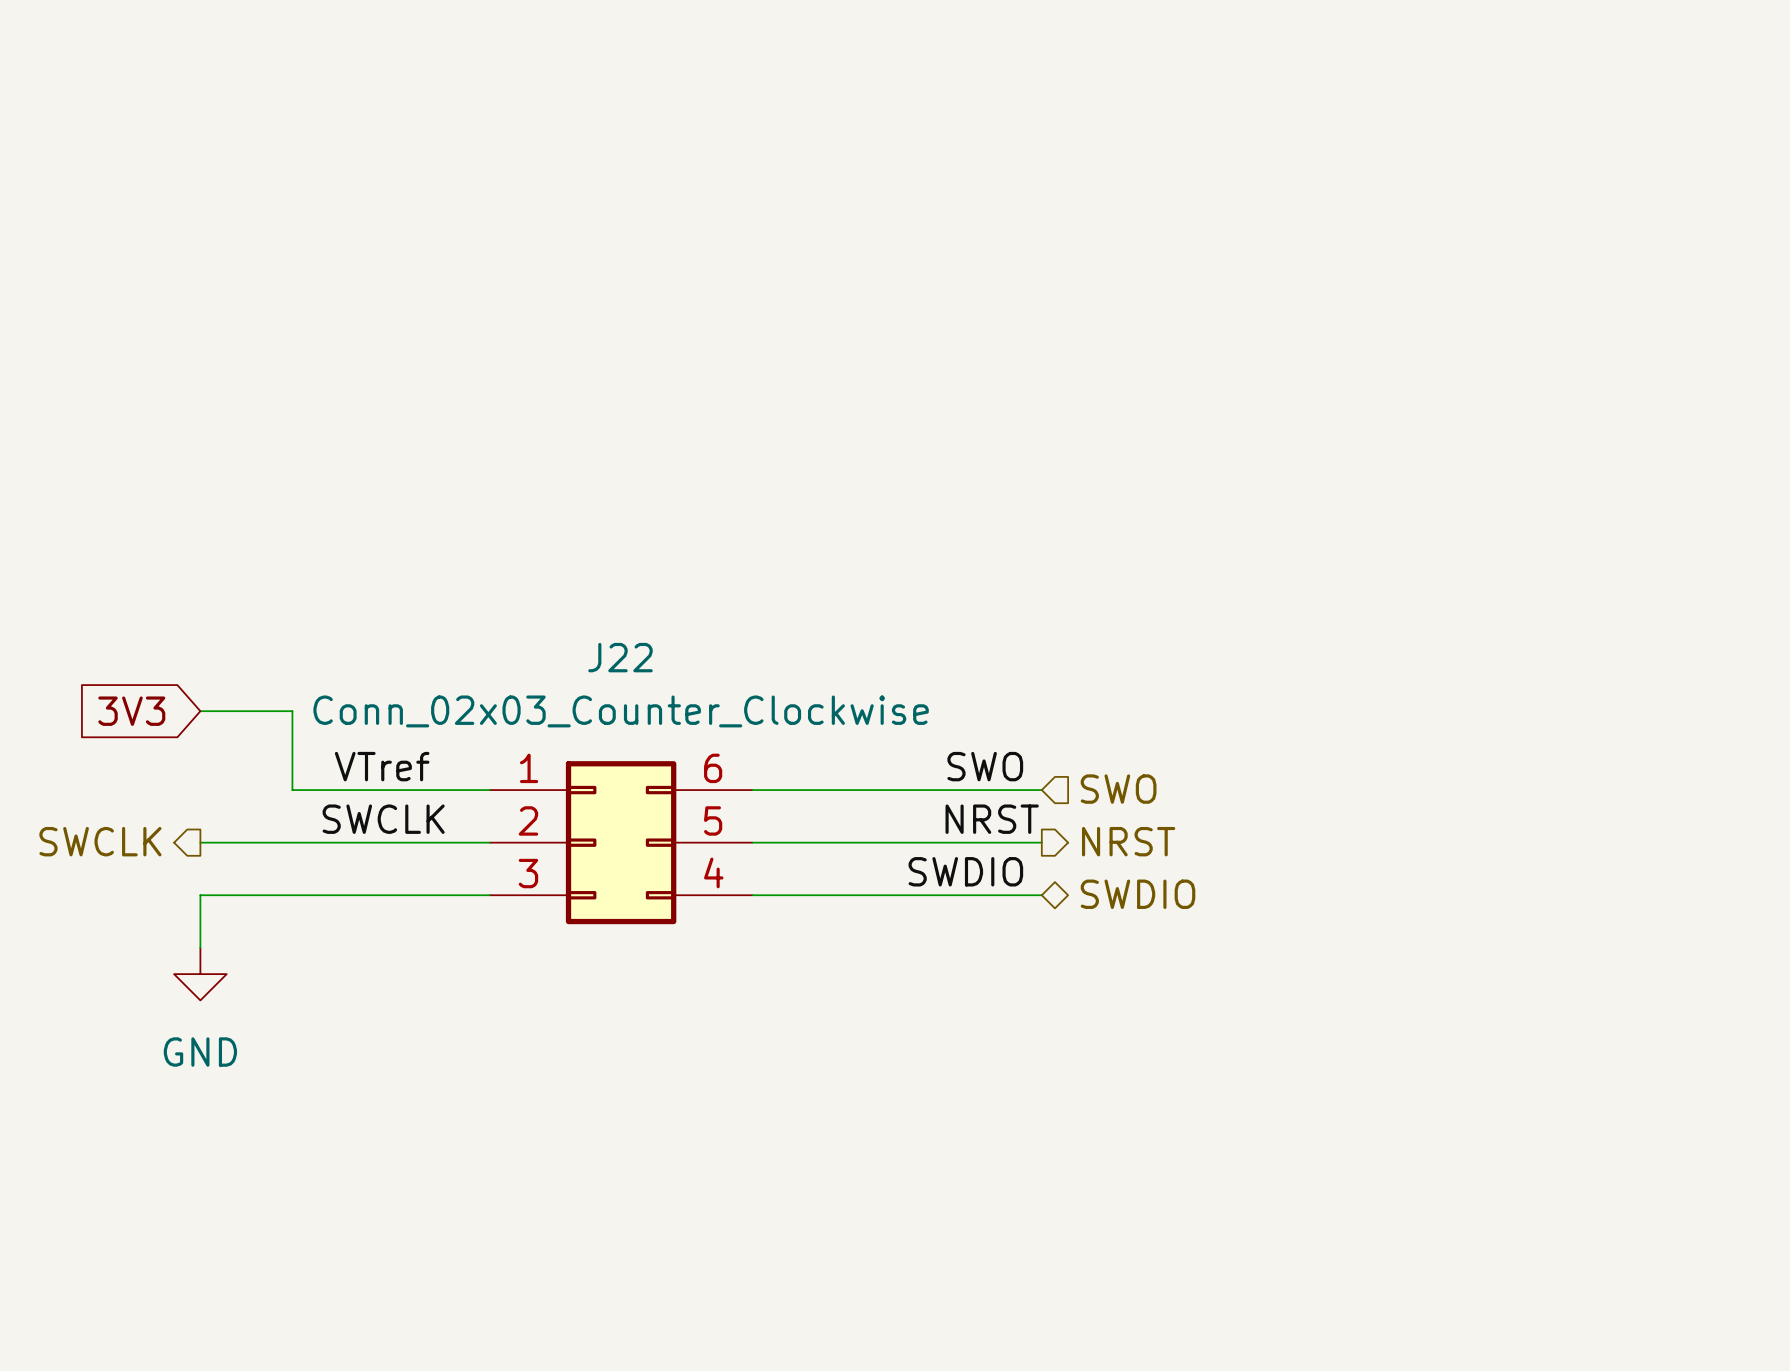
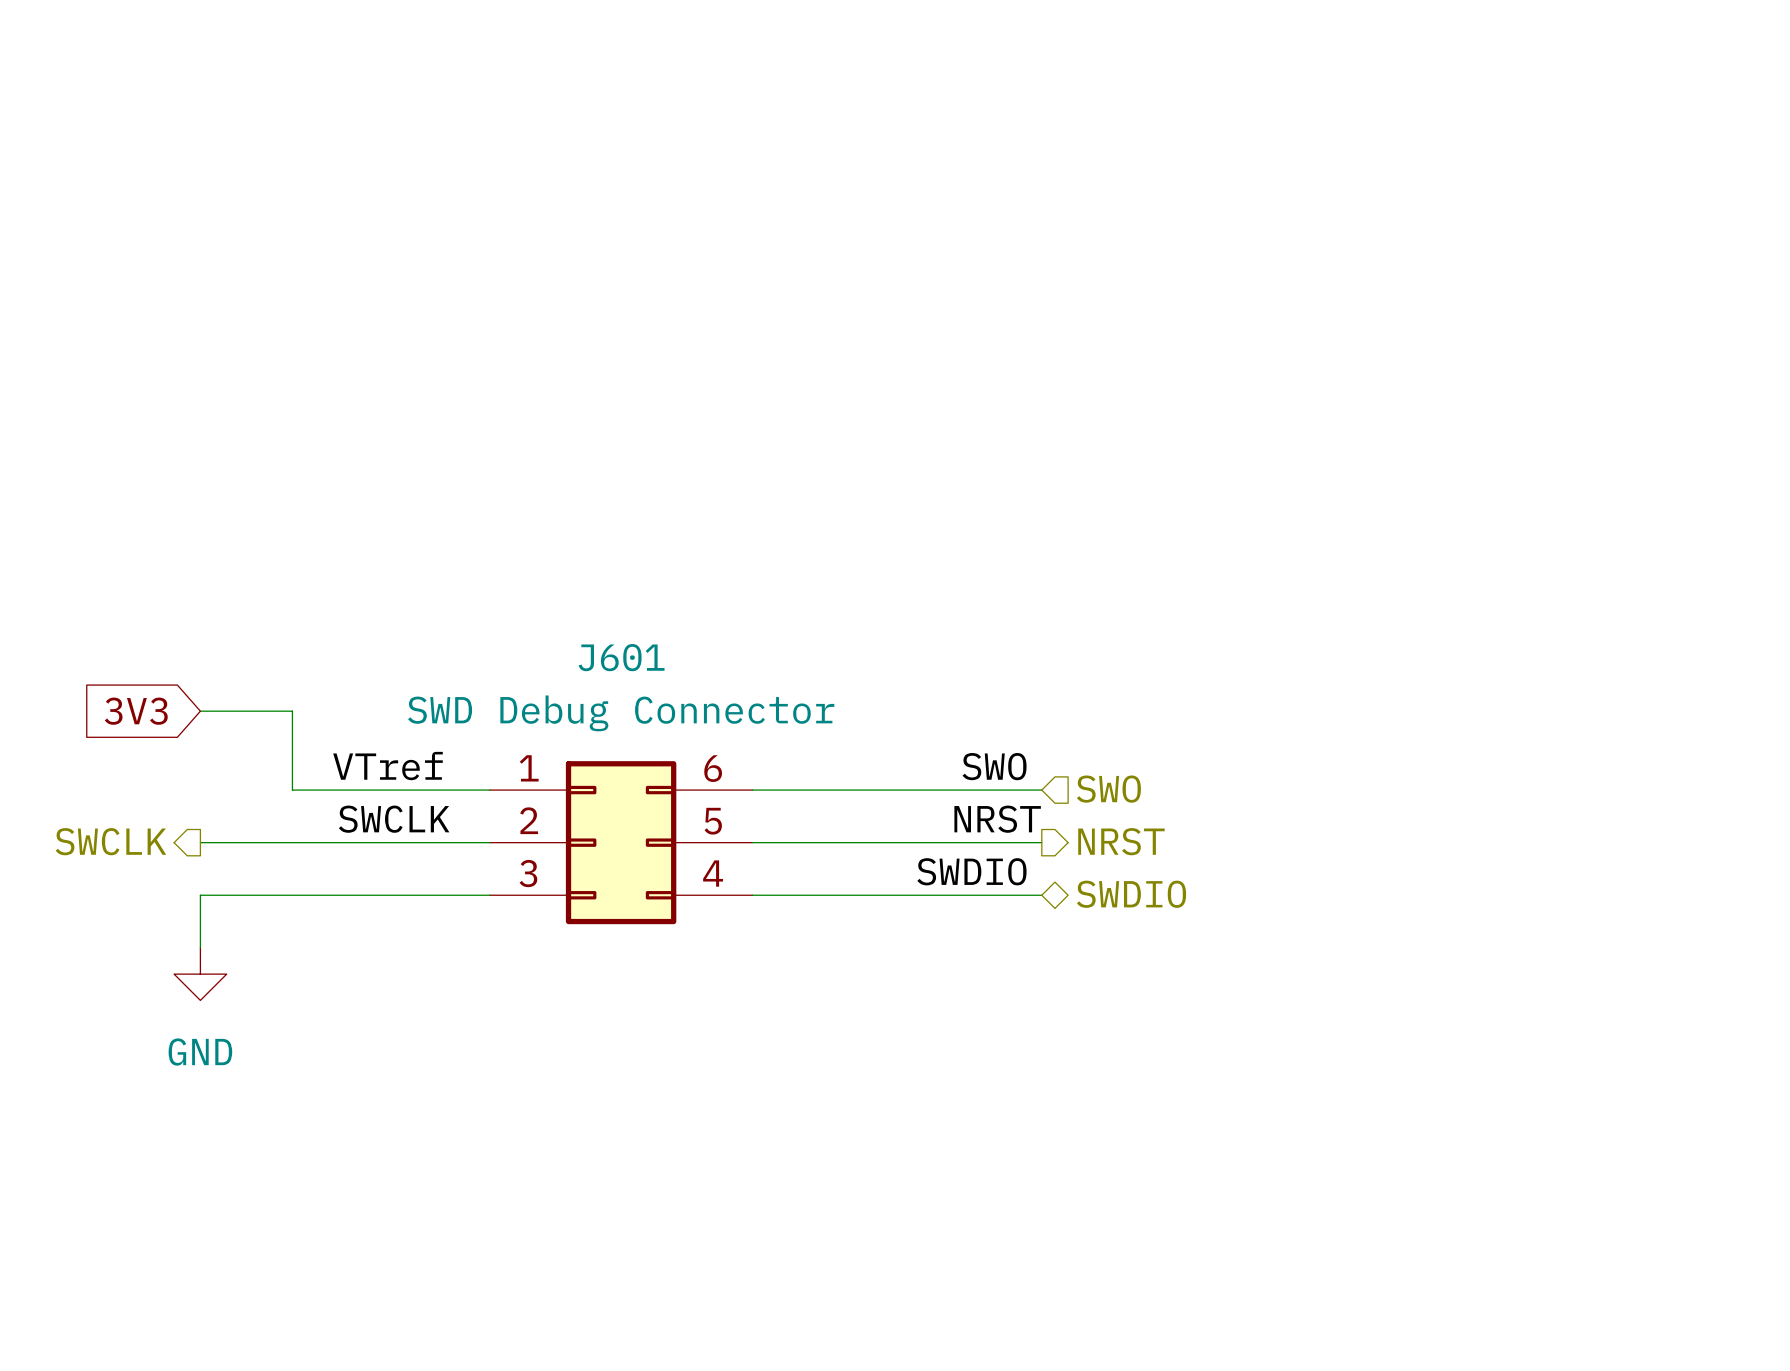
J22 name: J22 (620, 657) -> J601 (621, 657)
J22 value: Conn_02x03_Counter_Clockwise (621, 711) -> SWD Debug Connector (621, 713)

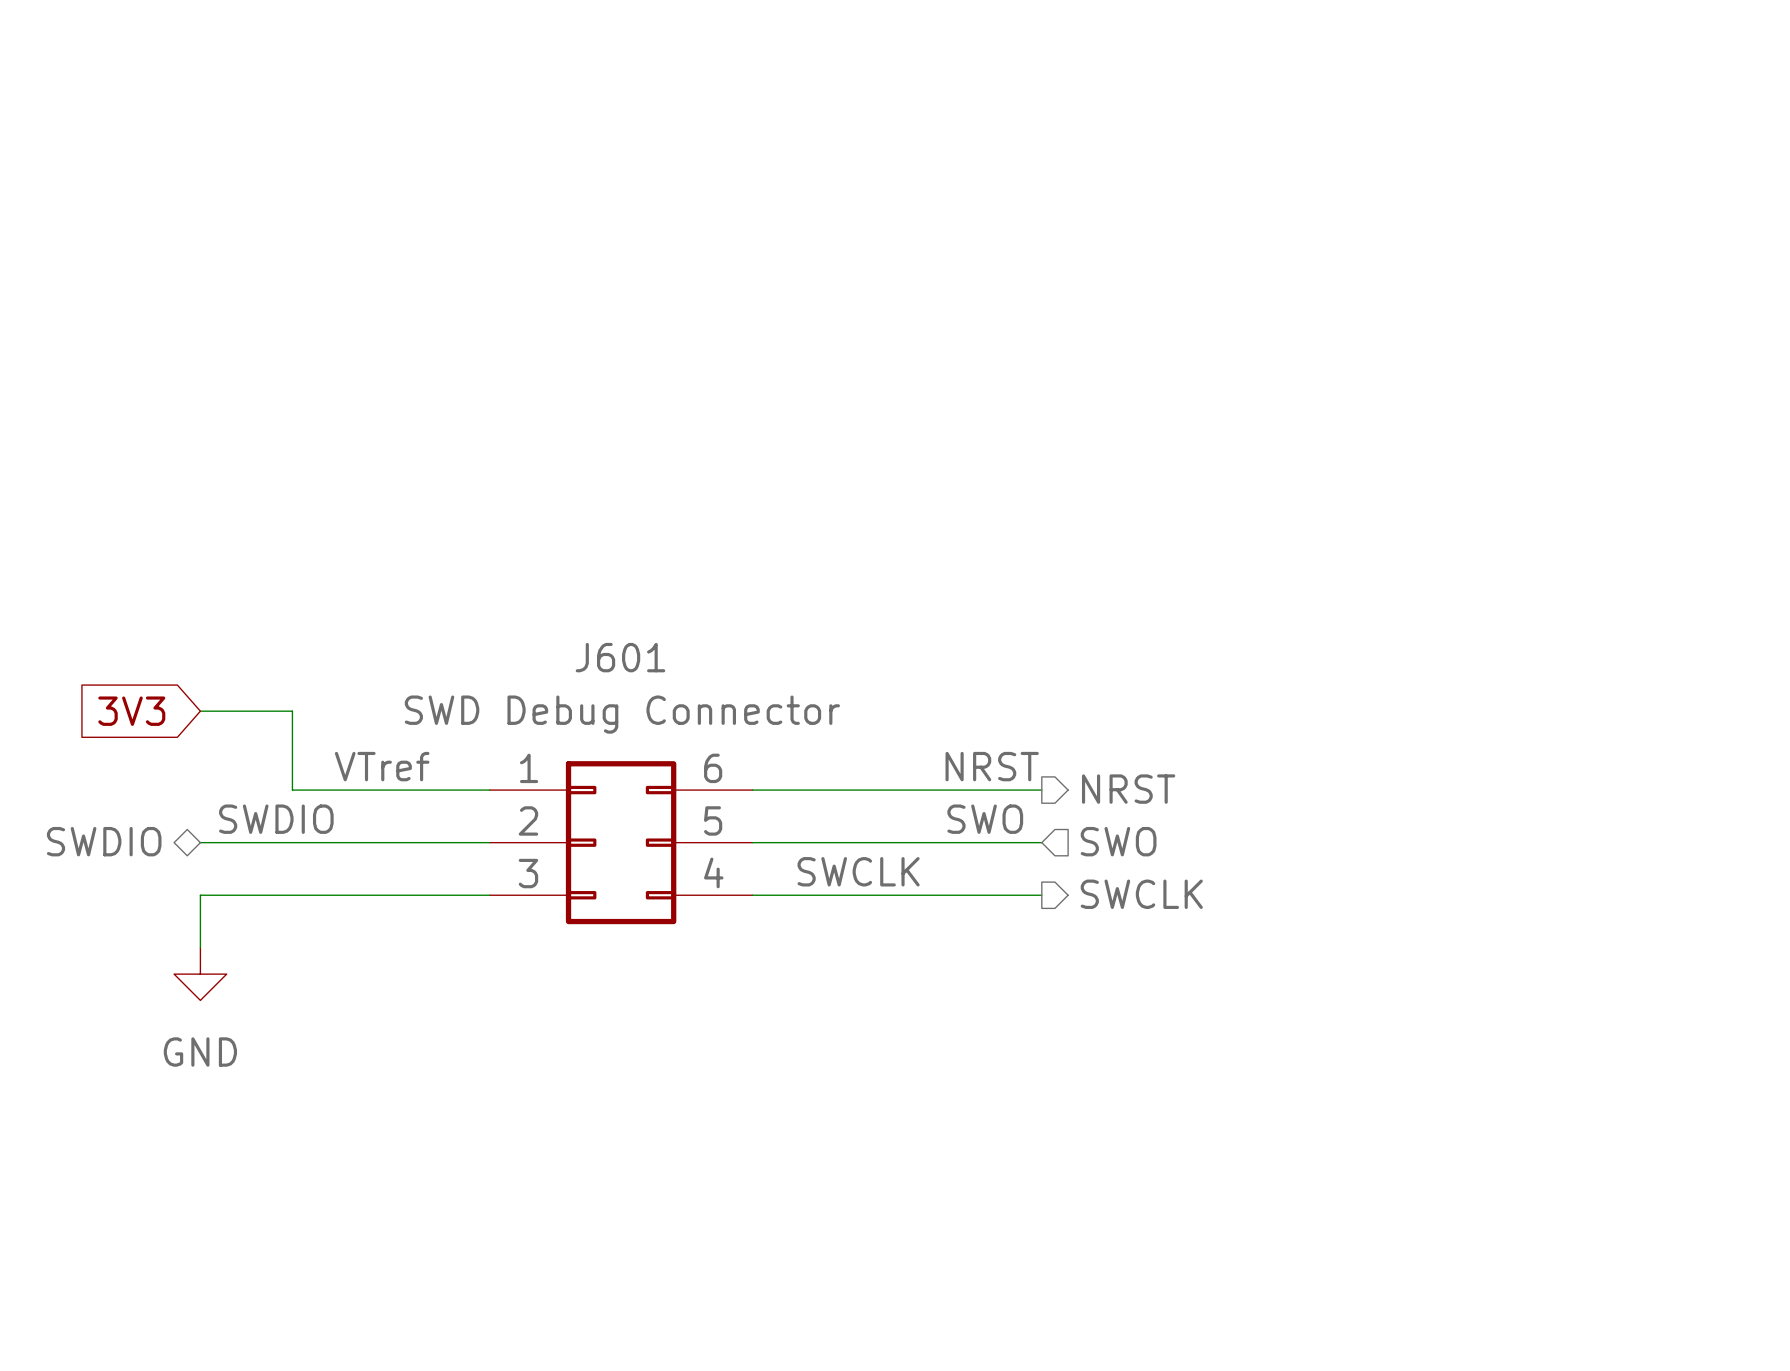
label position: SWO (994, 766) -> SWO (985, 819)
hierarchical label shape: input (1108, 789) -> output (1128, 789)
hierarchical label: SWO (1108, 789) -> NRST (1128, 789)
label: none -> SWDIO (276, 819)
label position: SWCLK (394, 819) -> SWCLK (858, 871)
label position: NRST (997, 819) -> NRST (992, 766)
hierarchical label shape: output (110, 841) -> bidirectional (104, 841)
hierarchical label: SWCLK (110, 841) -> SWDIO (104, 841)
hierarchical label shape: output (1121, 841) -> input (1118, 841)
hierarchical label: NRST (1121, 841) -> SWO (1118, 841)
label: SWDIO (971, 871) -> none
hierarchical label shape: bidirectional (1131, 894) -> output (1141, 894)
hierarchical label: SWDIO (1131, 894) -> SWCLK (1141, 894)

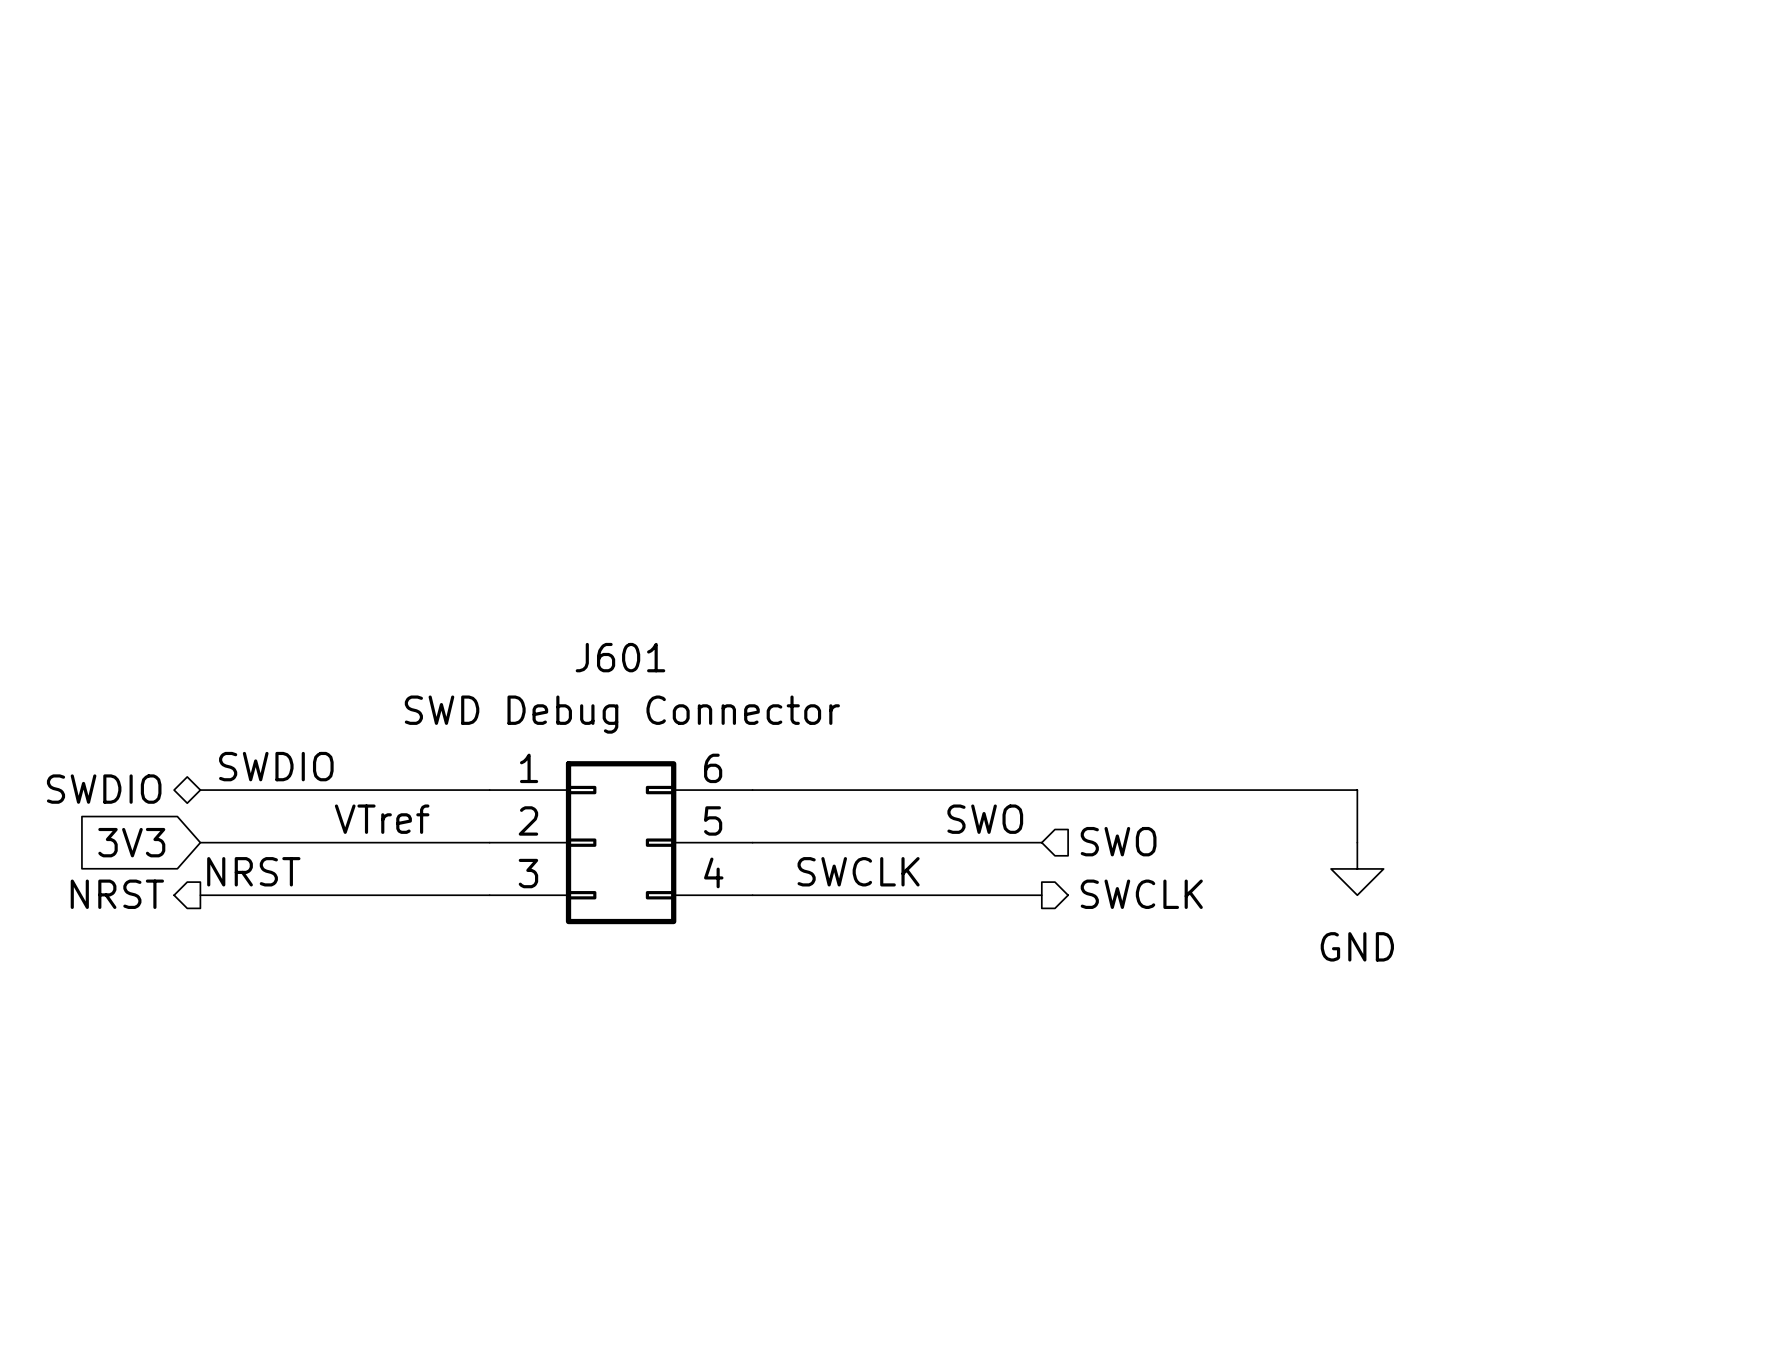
global label position: 3V3 (131, 711) -> 3V3 (131, 842)
wire: (200, 711) (292, 711) (292, 790) -> (200, 790) (292, 790)
label position: VTref (382, 766) -> VTref (382, 819)
label: NRST (992, 766) -> none
hierarchical label: NRST (1128, 789) -> none
wire: none -> (1041, 790) (1357, 790) (1357, 842)
label position: SWDIO (276, 819) -> SWDIO (276, 766)
hierarchical label position: SWDIO (104, 841) -> SWDIO (104, 789)
power symbol: none -> GND (1357, 868)
label: none -> NRST (253, 871)
hierarchical label: none -> NRST (117, 894)
wire: (200, 895) (200, 947) -> none
power symbol: GND (200, 974) -> none

